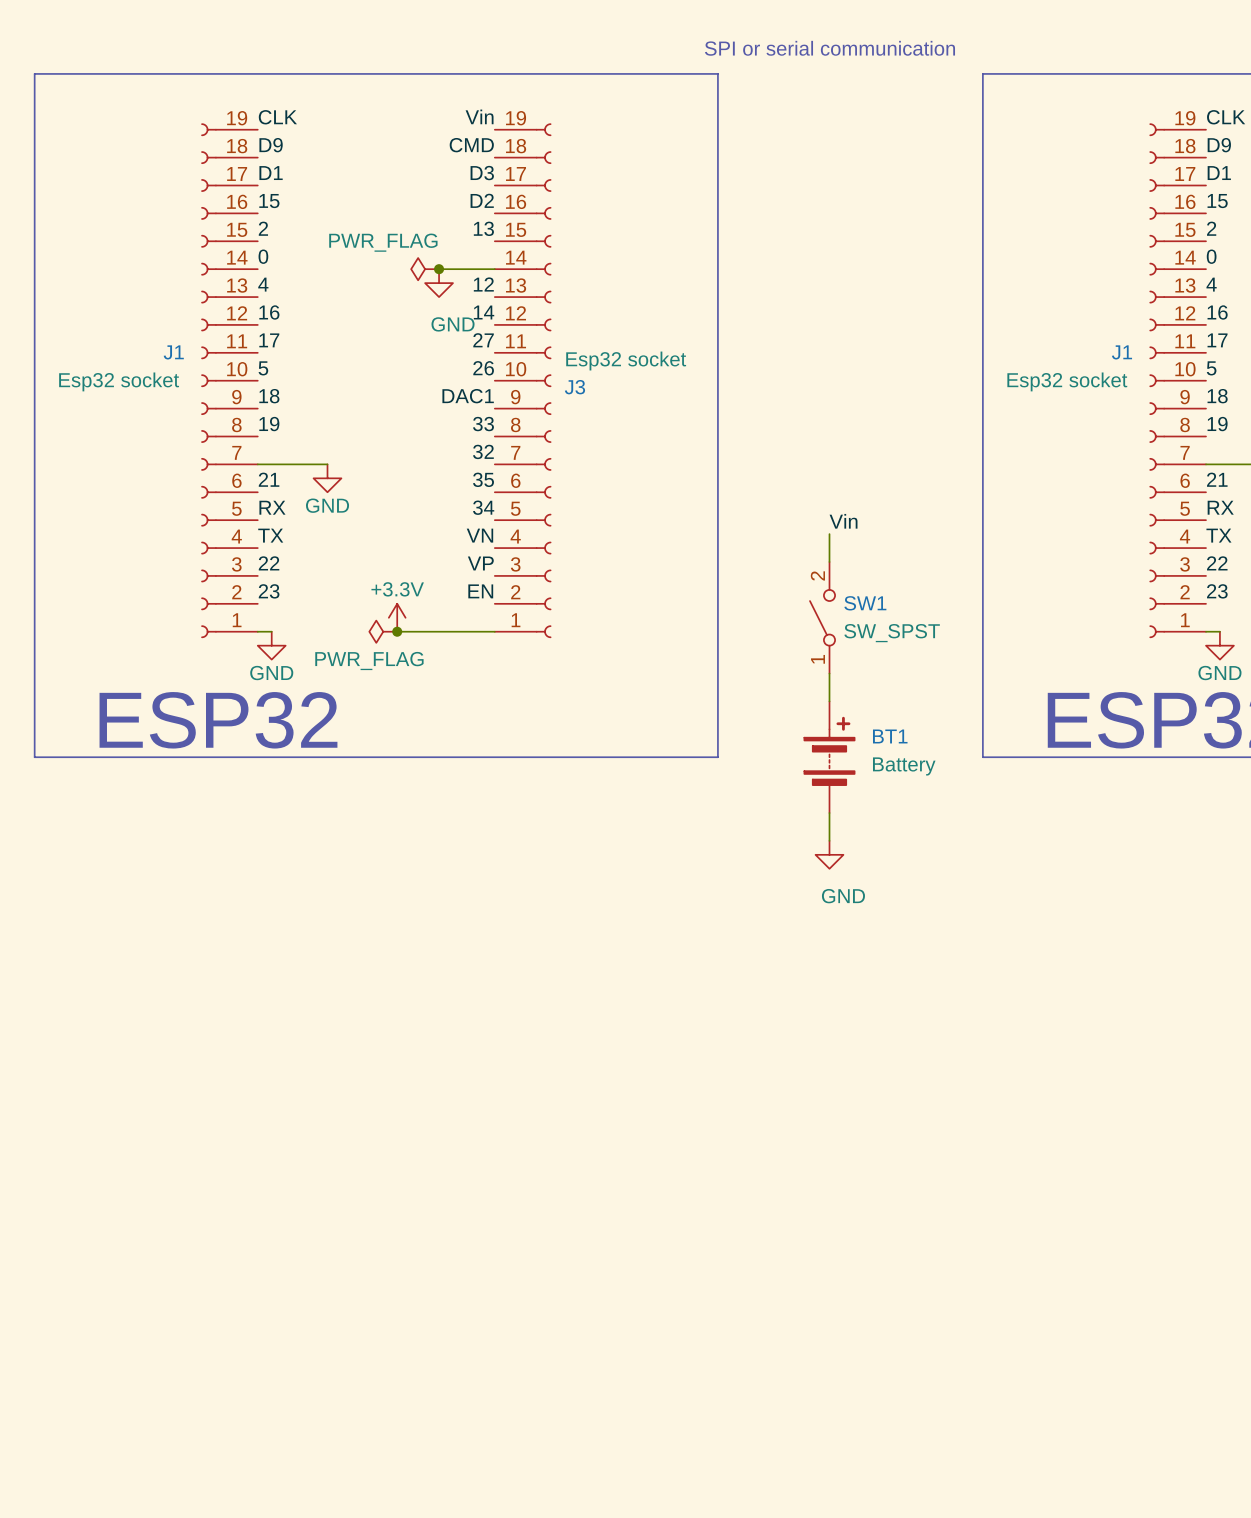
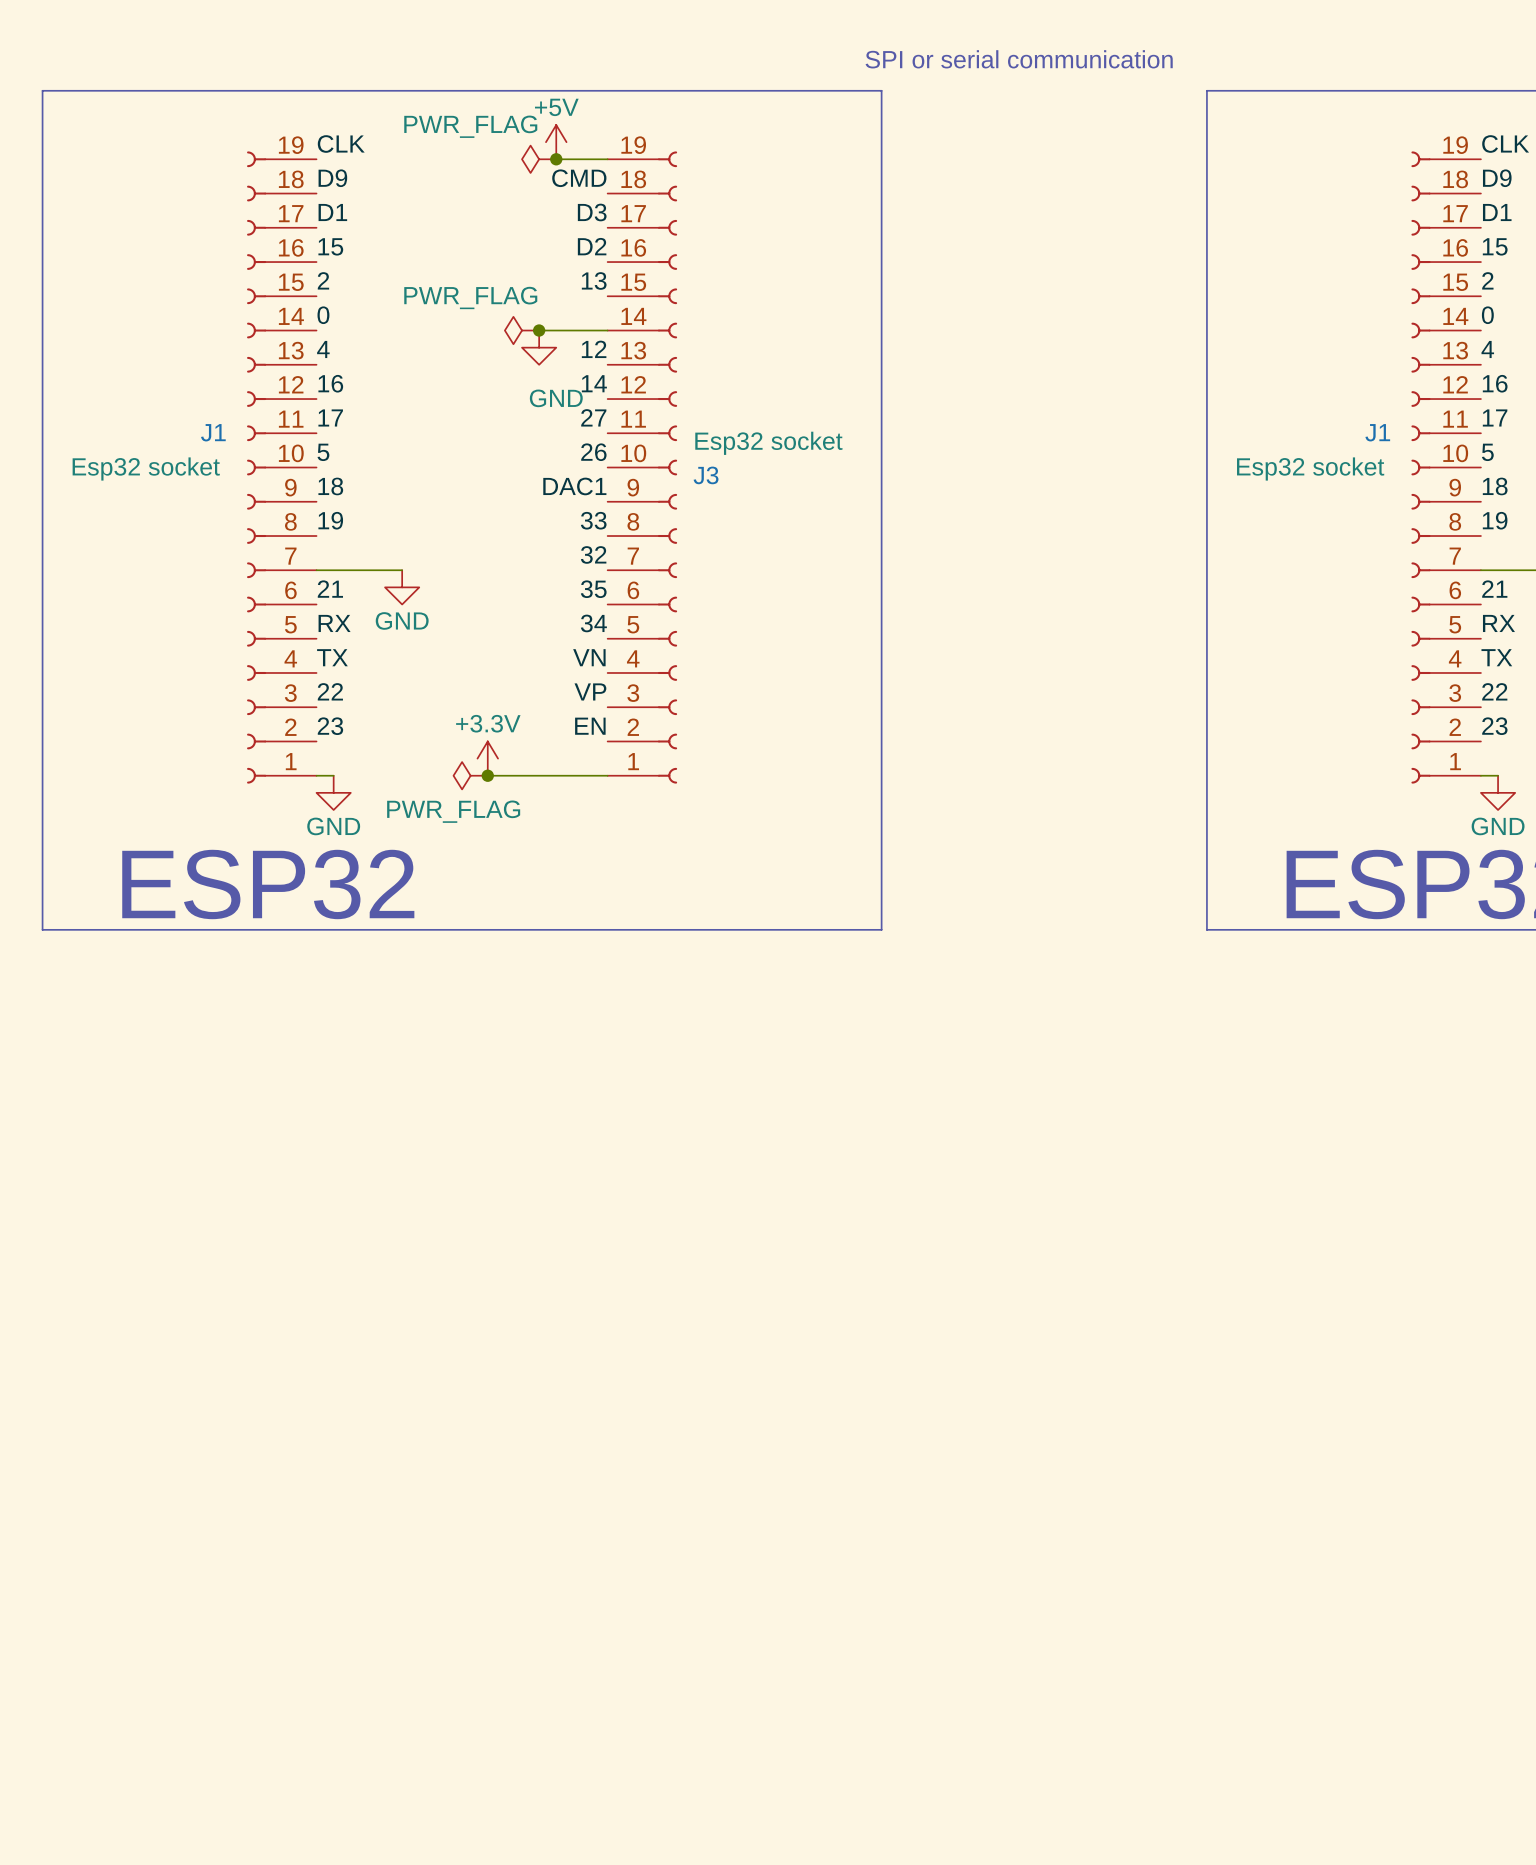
power symbol: none -> +5V (556, 142)
label: Vin (479, 116) -> none
power symbol: none -> PWR_FLAG (539, 159)
wire: none -> (556, 159) (607, 159)
junction: none -> (556, 159)
label: Vin (843, 521) -> none
wire: (829, 534) (829, 562) -> none
SW1: SW_SPST (822, 617) -> none
wire: (829, 673) (829, 701) -> none
BT1: Battery (829, 757) -> none
wire: (829, 813) (829, 840) -> none
power symbol: GND (829, 854) -> none

